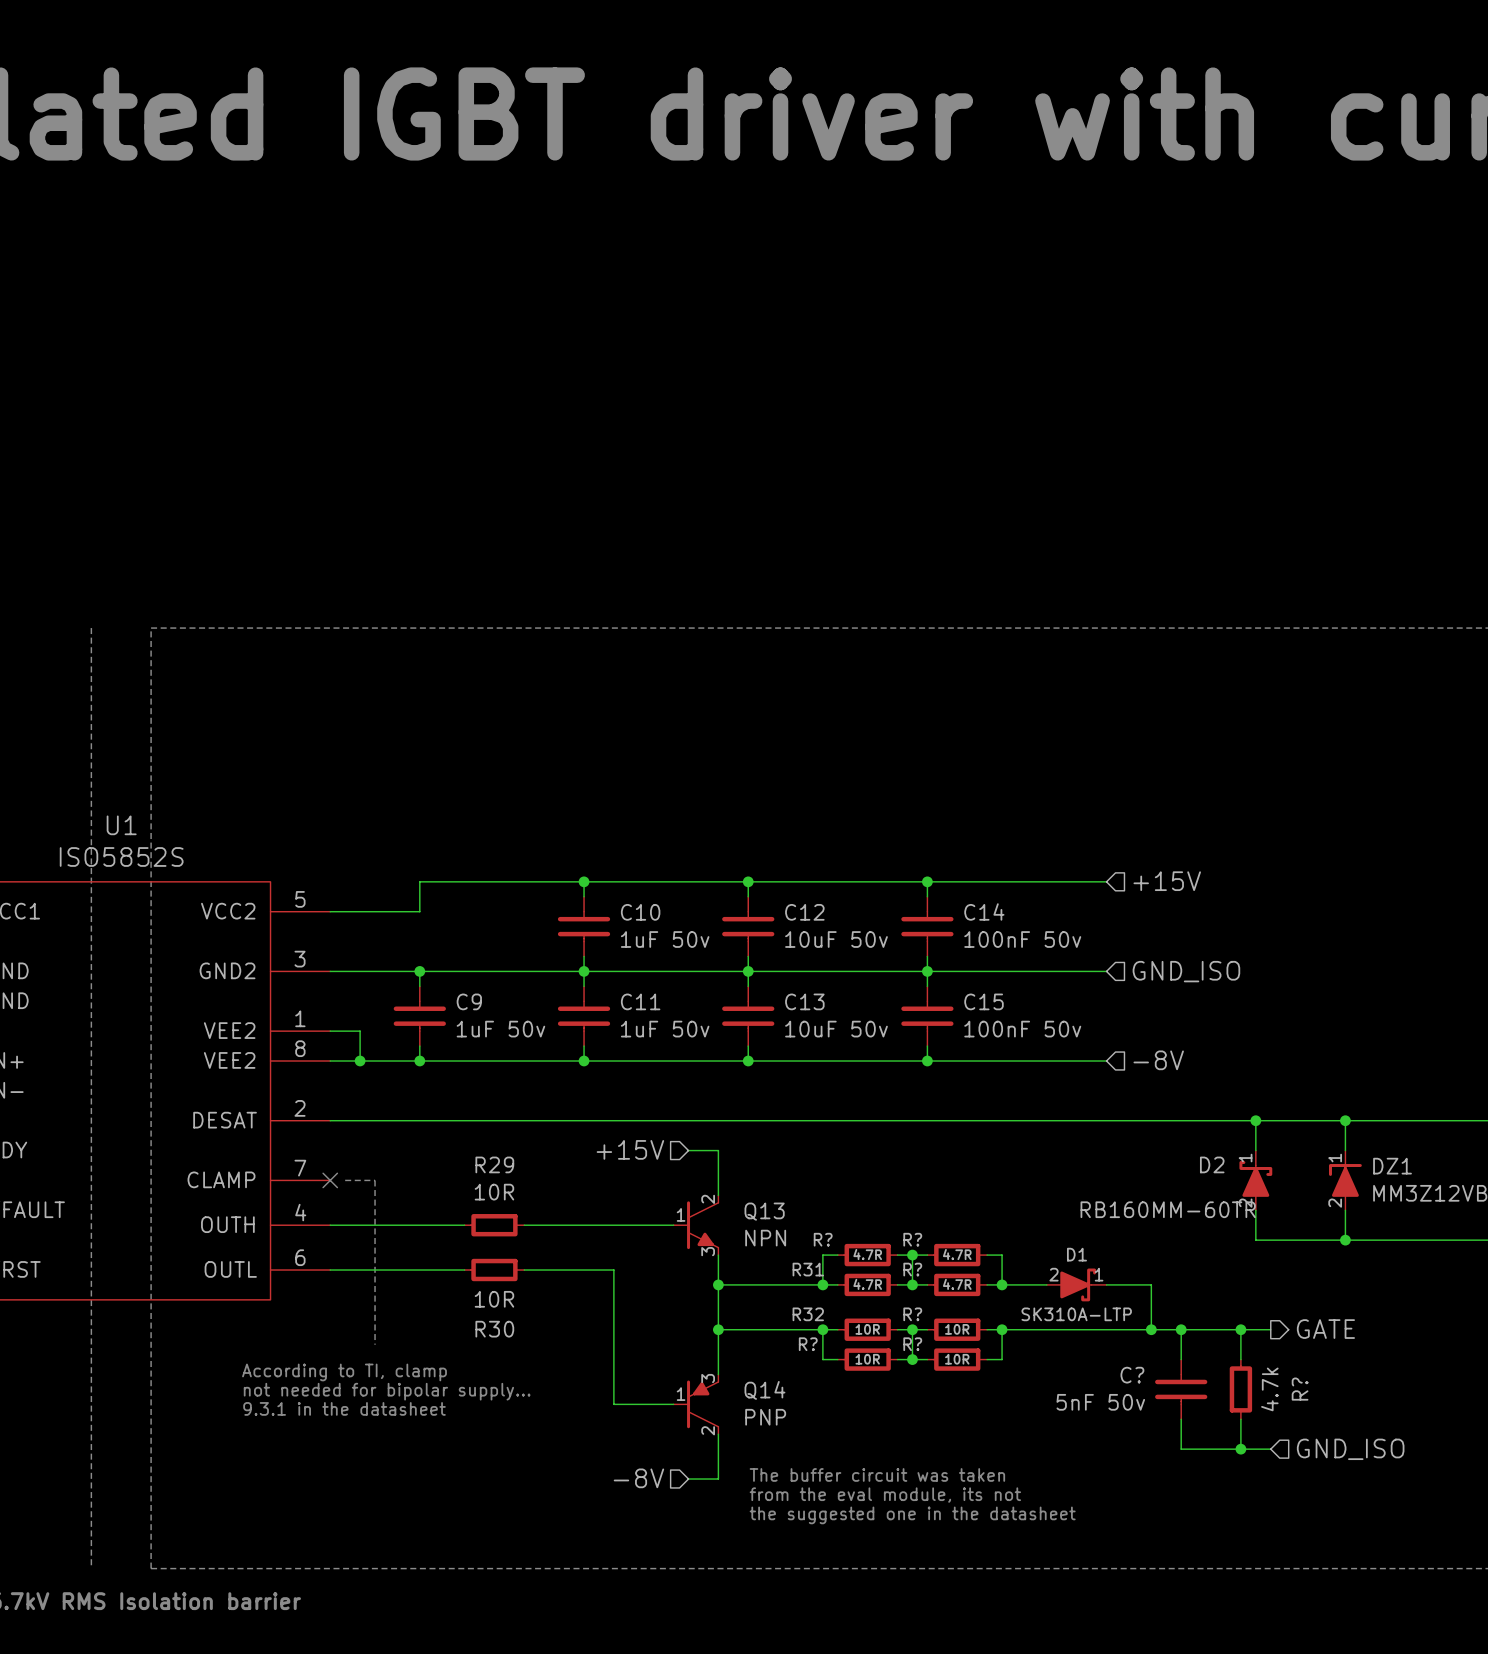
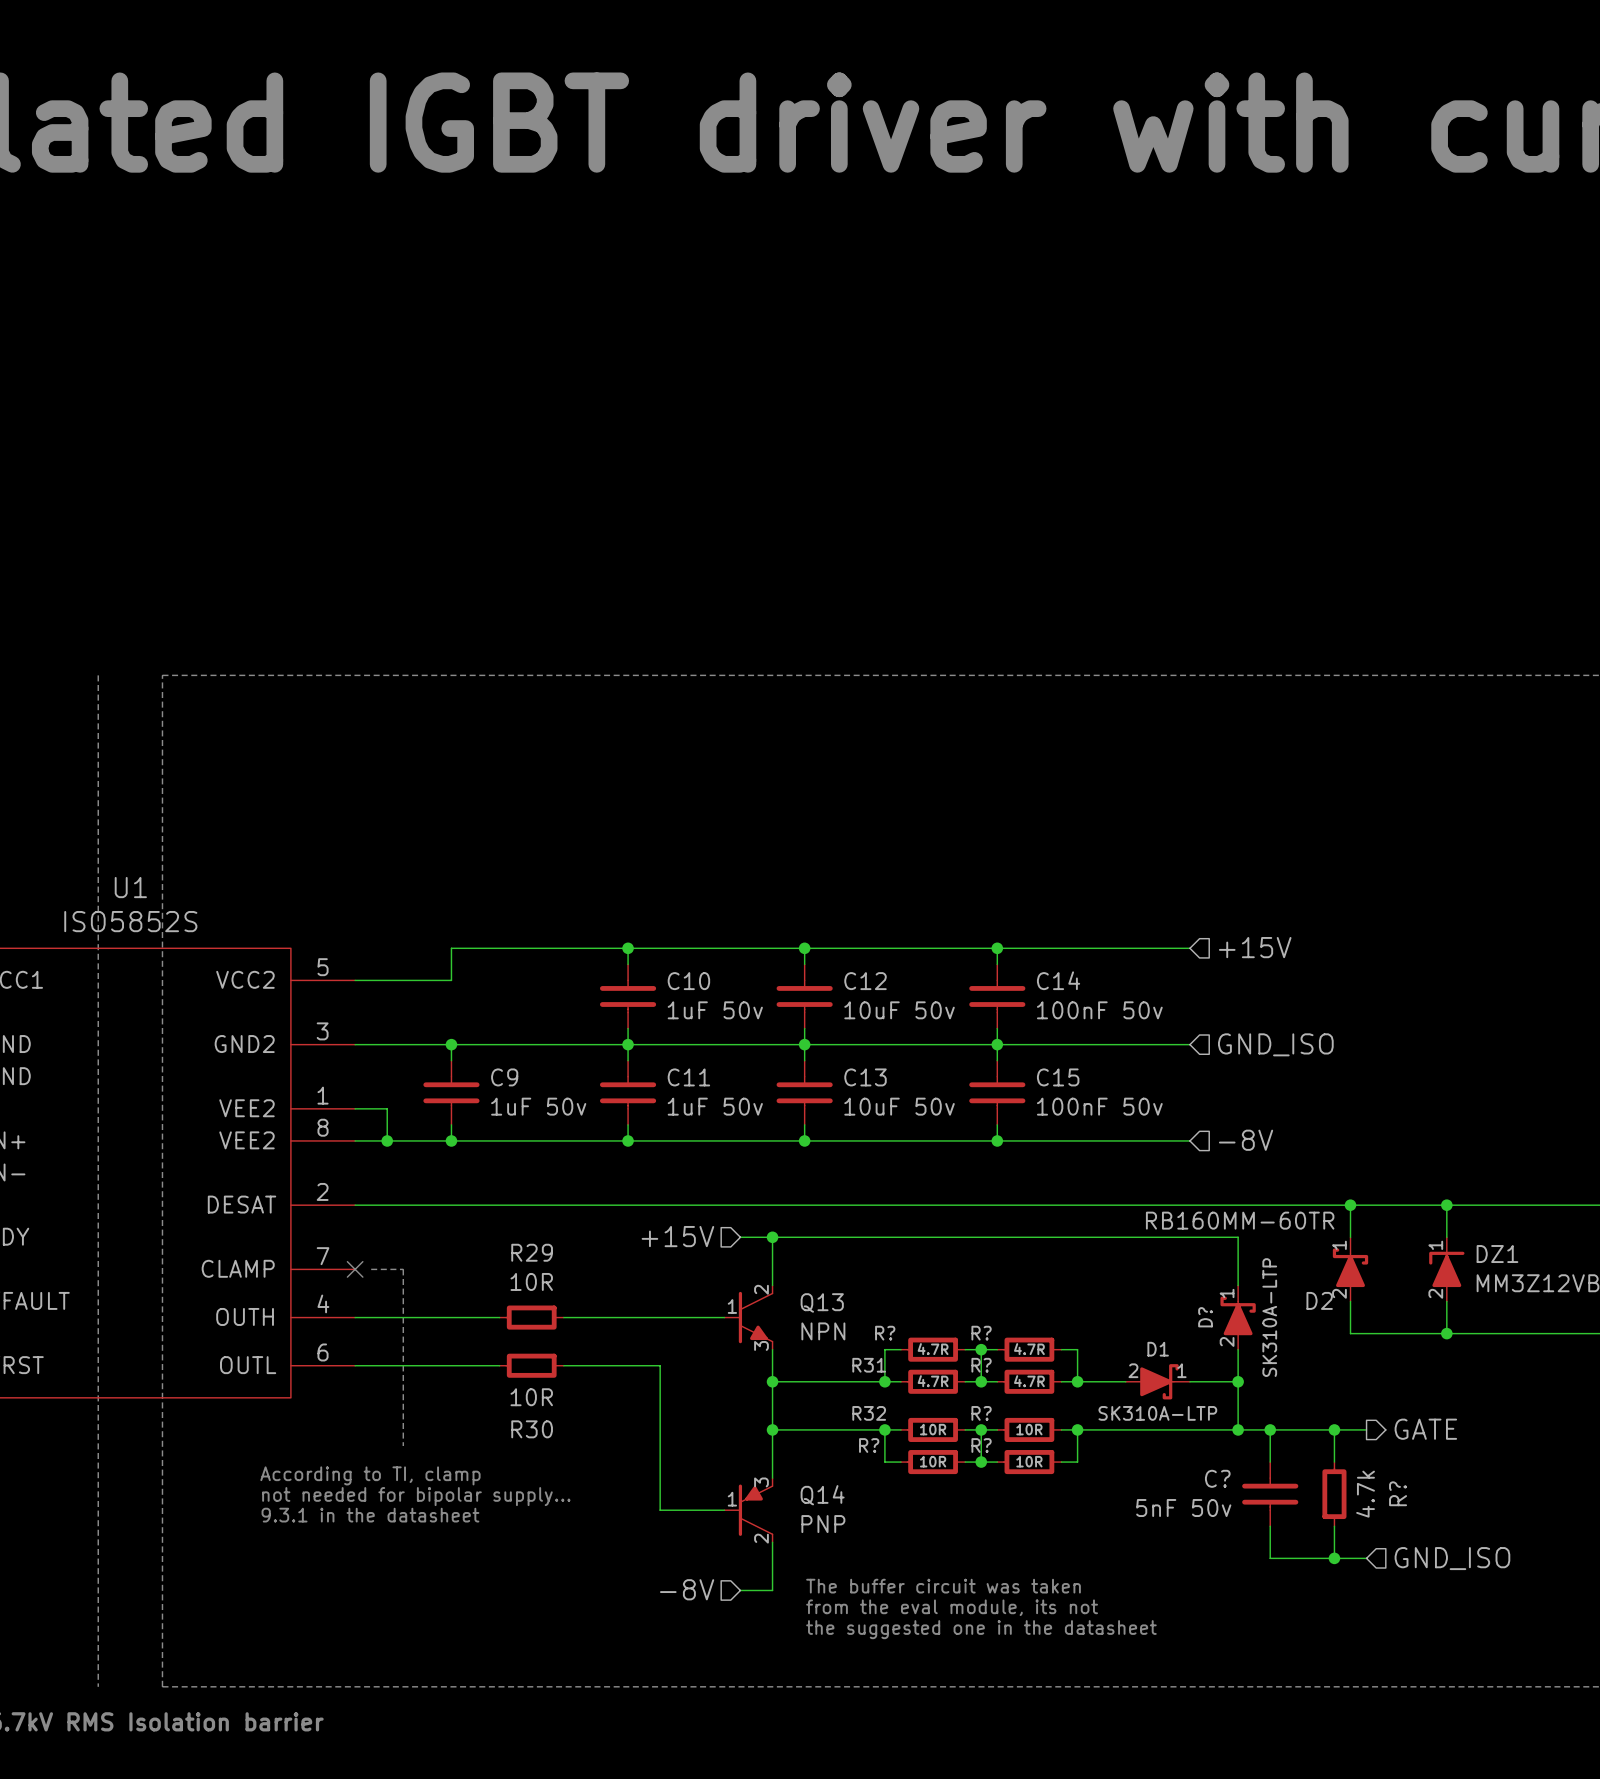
wire: none -> (772, 1237) (1238, 1237) (1238, 1285)
junction: none -> (772, 1237)
D2 name position: D2 (1212, 1164) -> D2 (1319, 1300)
D2 value position: RB160MM-60TR (1168, 1209) -> RB160MM-60TR (1240, 1220)
D?: none -> SK310A-LTP (1238, 1317)
wire: none -> (1238, 1349) (1238, 1381)
junction: none -> (1238, 1381)

